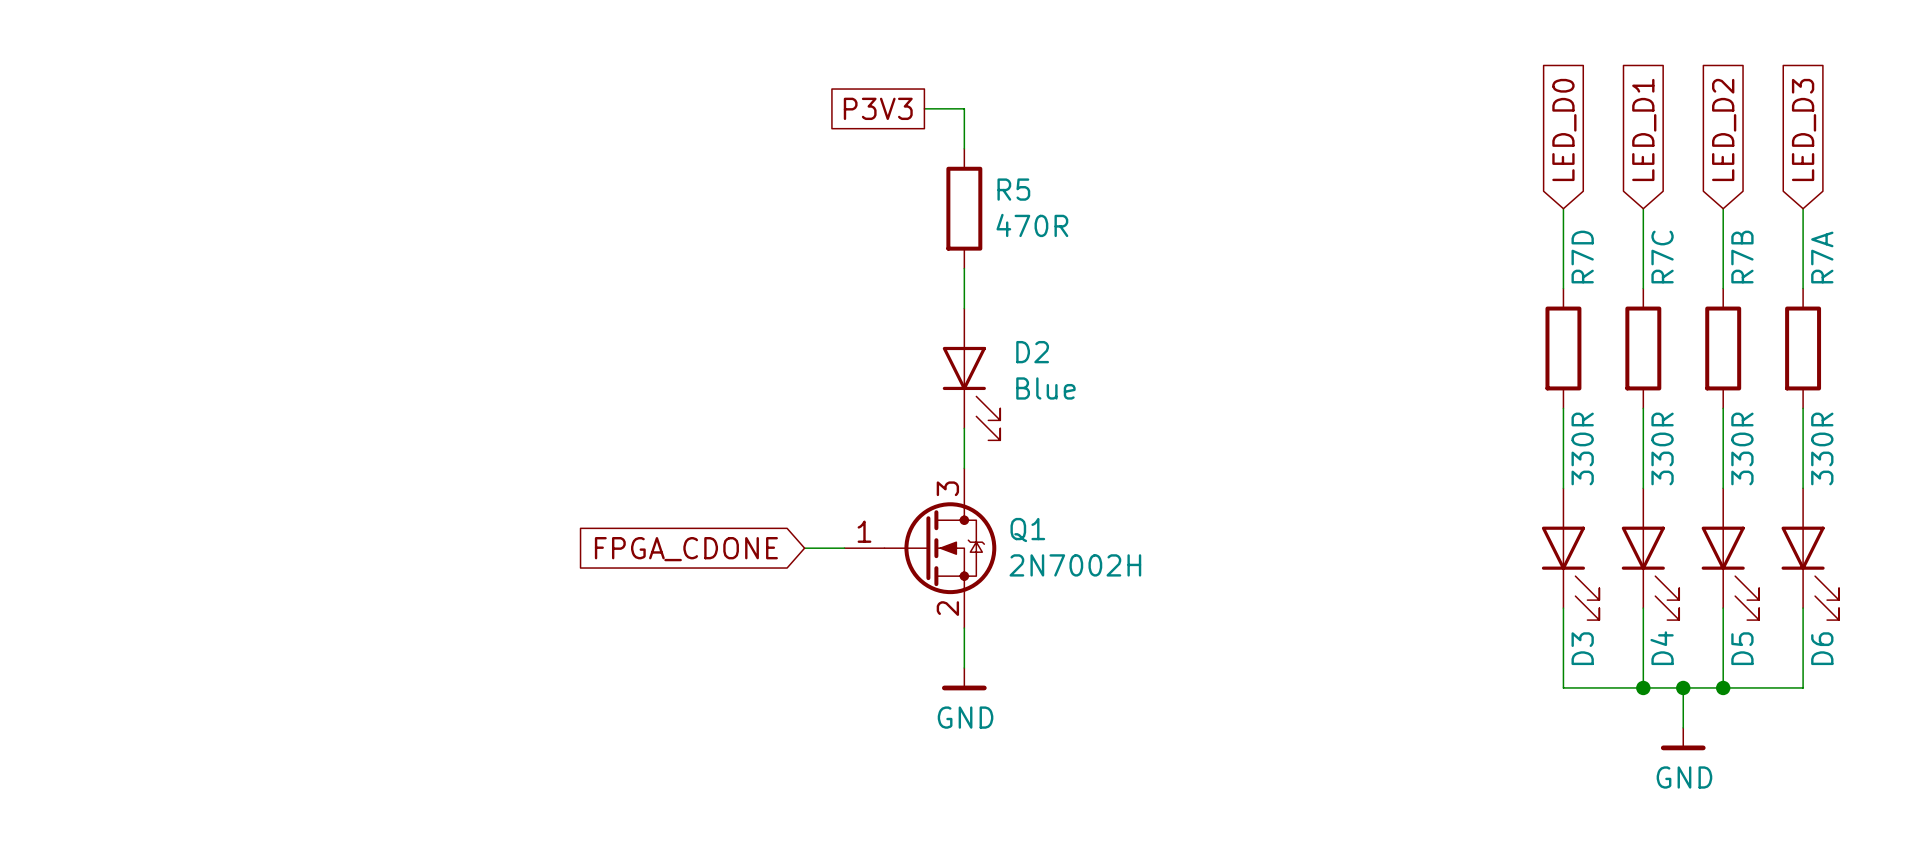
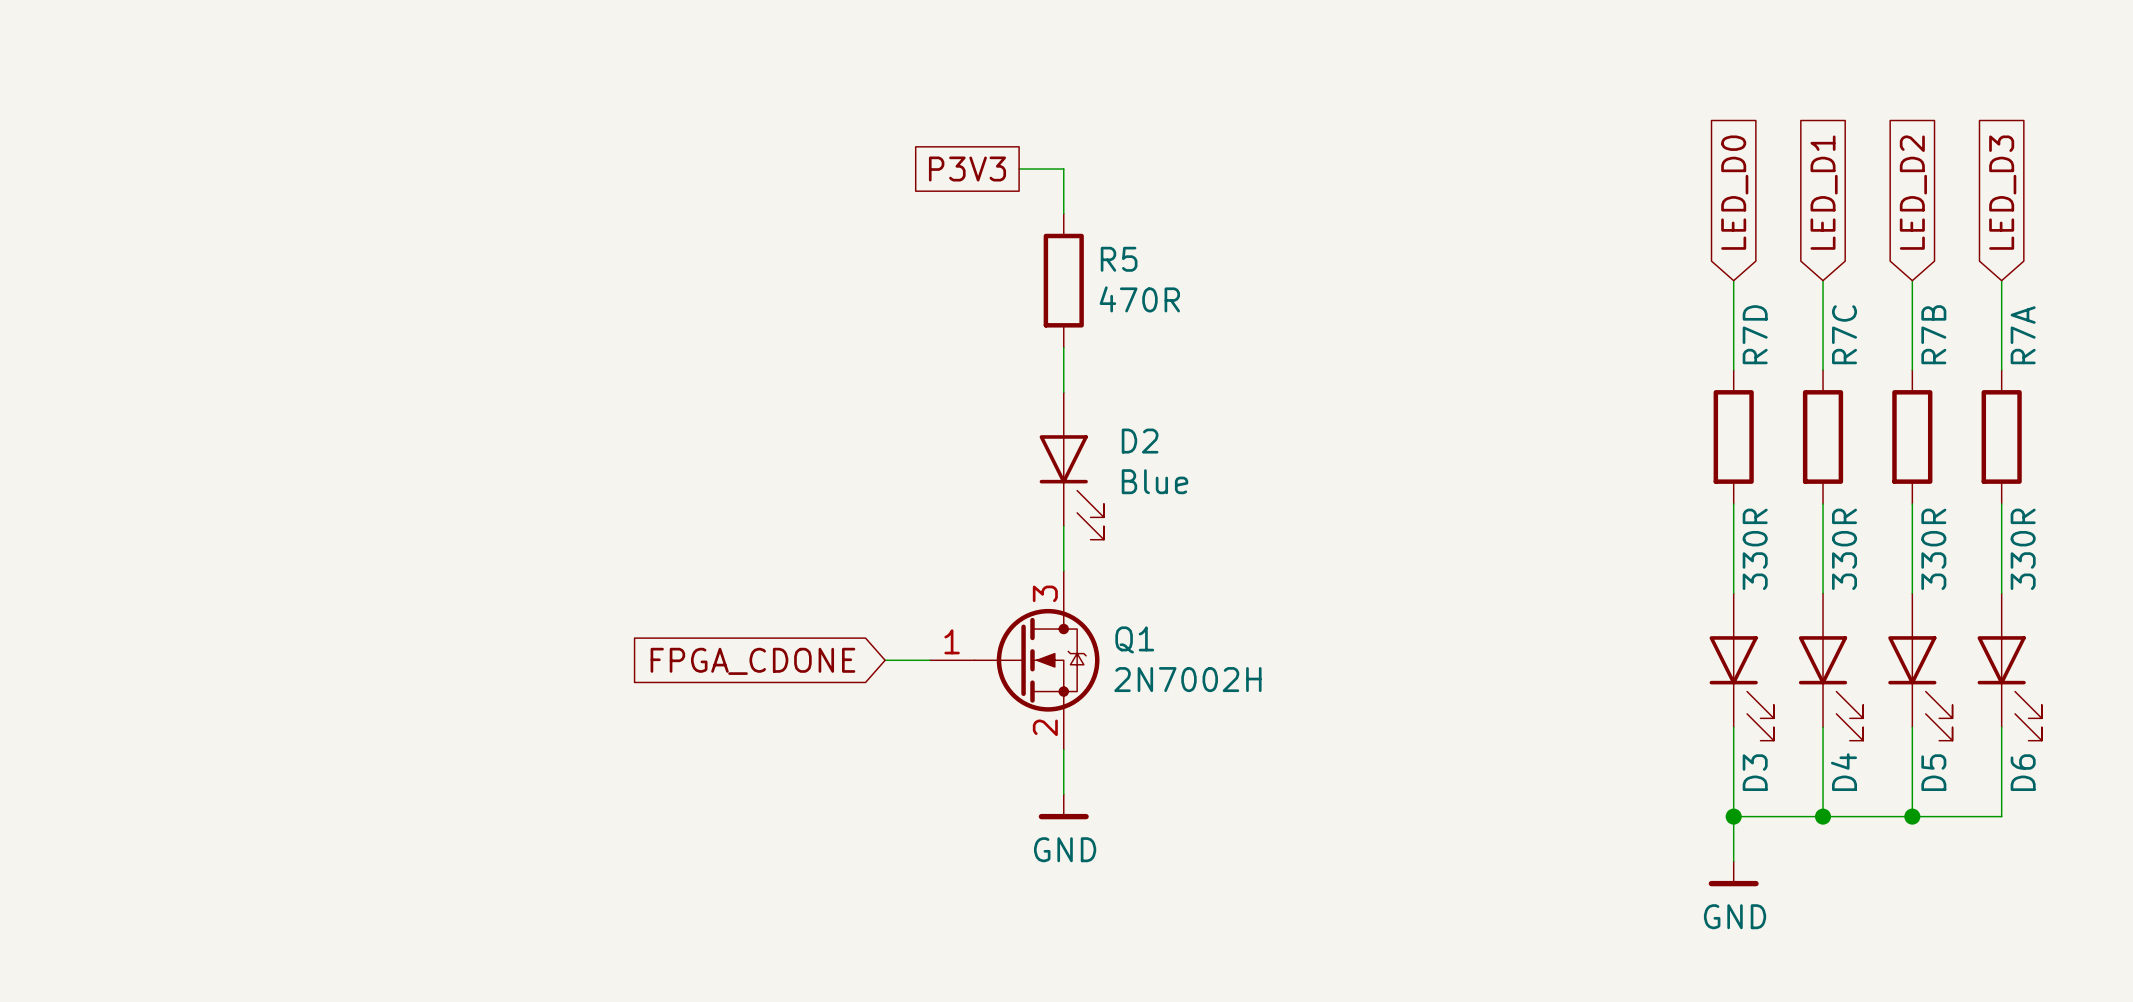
junction: none -> (1733, 816)
wire: (1683, 687) (1683, 727) -> (1733, 816) (1733, 861)
junction: (1683, 687) -> none
power symbol position: GND (1683, 739) -> GND (1733, 873)

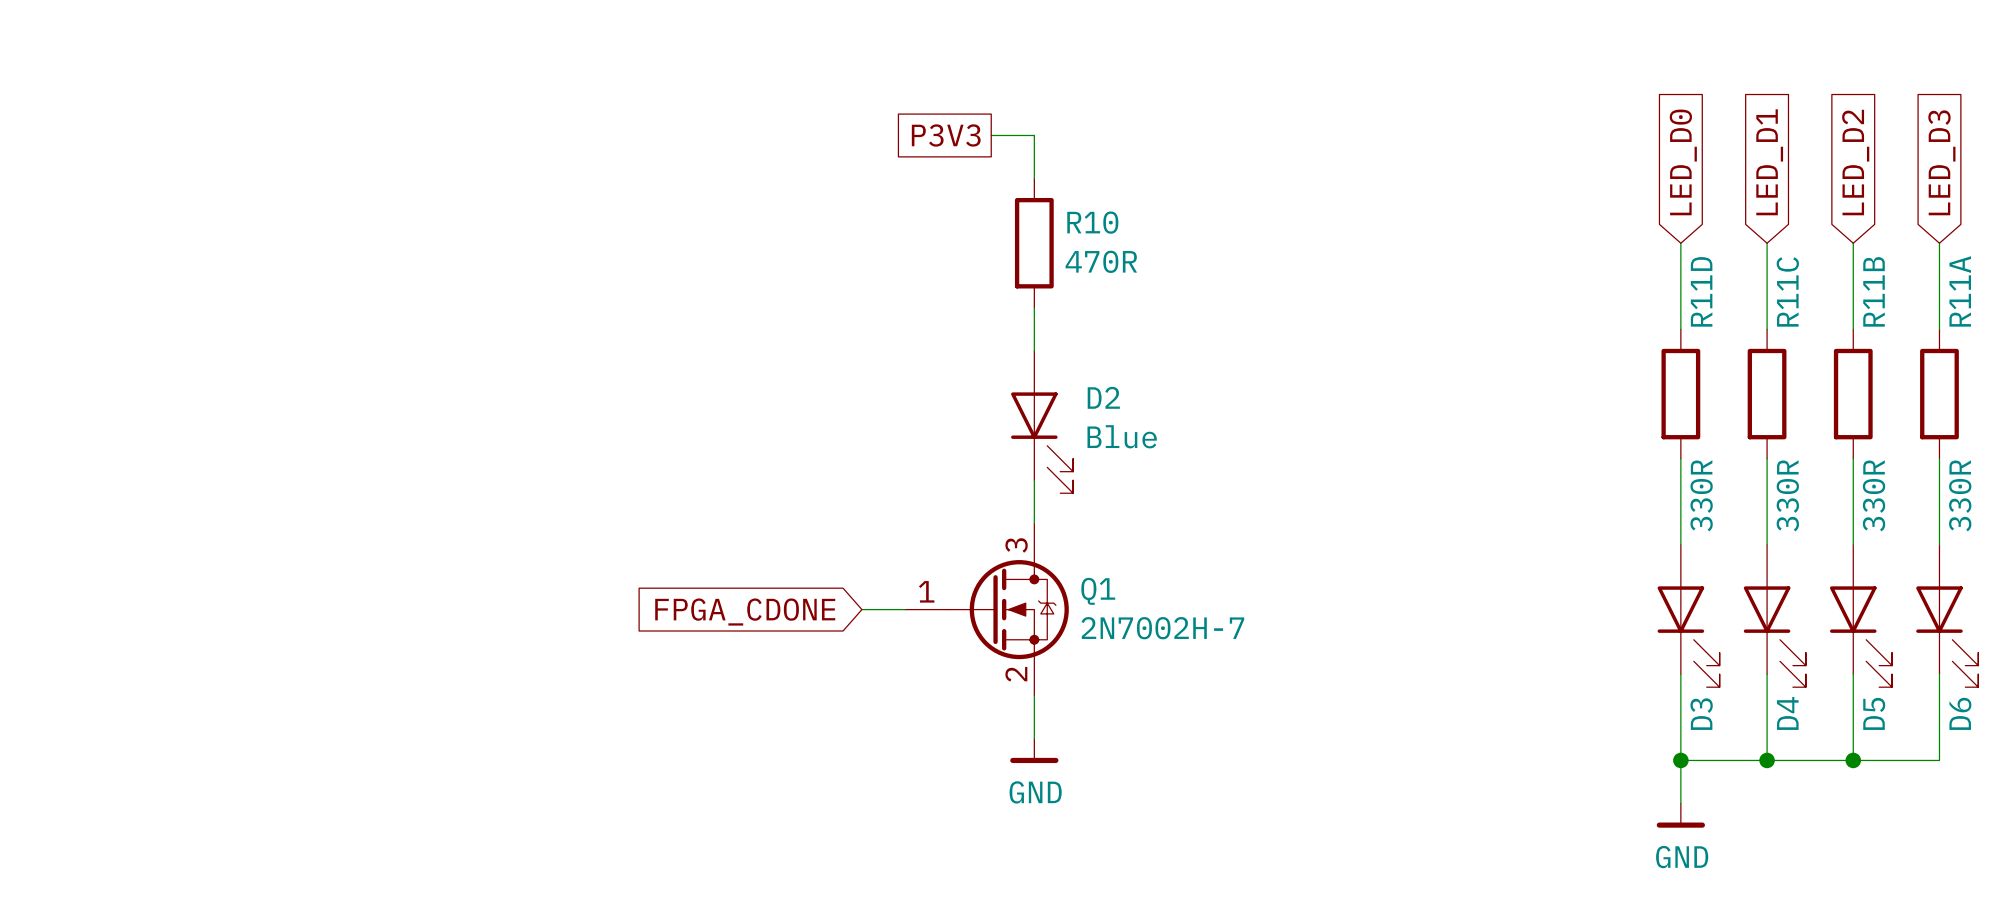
R5 name: R5 (1119, 259) -> R10 (1092, 222)
R7D name: R7D (1755, 334) -> R11D (1701, 291)
R7C name: R7C (1844, 334) -> R11C (1787, 291)
R7B name: R7B (1933, 334) -> R11B (1874, 291)
R7A name: R7A (2023, 335) -> R11A (1960, 291)
Q1 value: 2N7002H (1187, 679) -> 2N7002H-7 (1162, 628)

